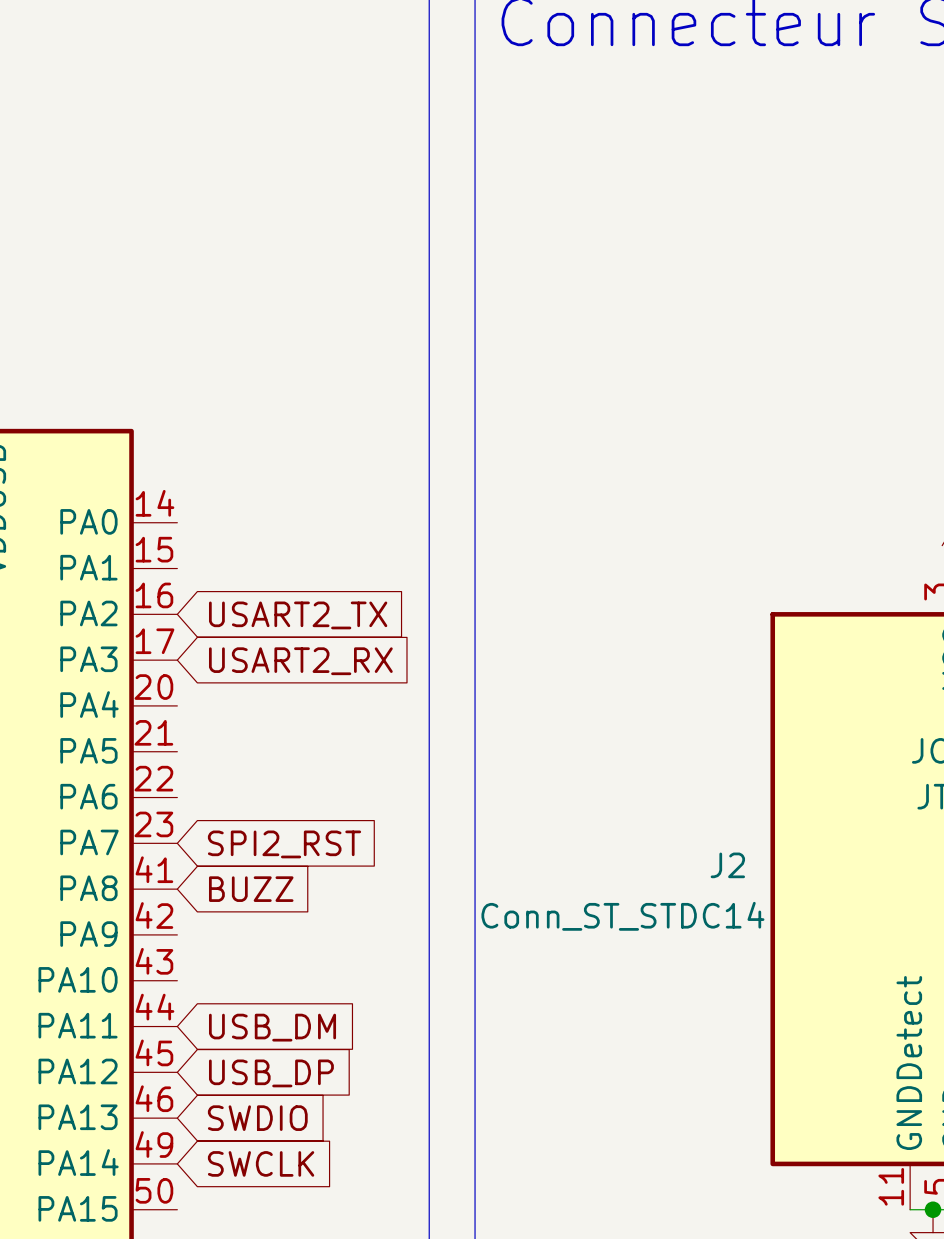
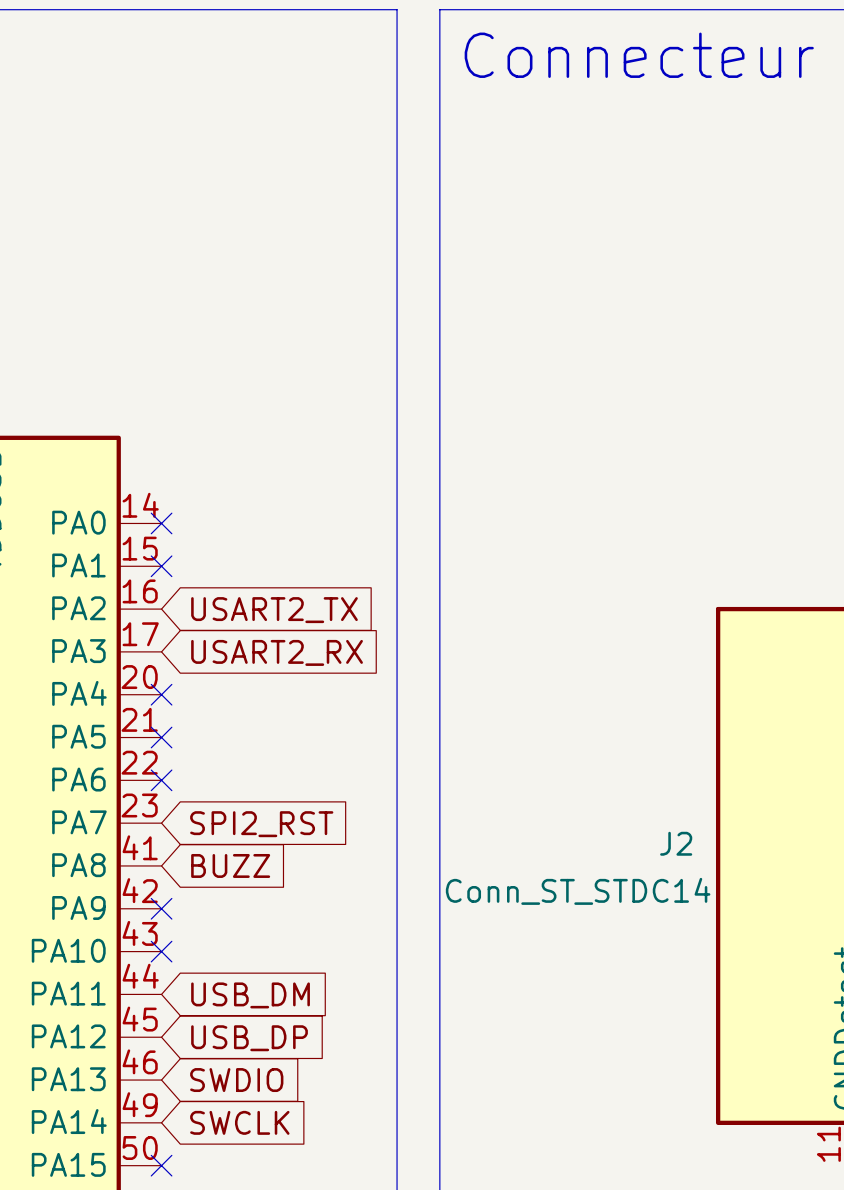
no-connect mark: none -> (161, 523)
no-connect mark: none -> (161, 566)
no-connect mark: none -> (161, 694)
no-connect mark: none -> (161, 737)
no-connect mark: none -> (161, 780)
no-connect mark: none -> (161, 908)
no-connect mark: none -> (161, 951)
no-connect mark: none -> (161, 1165)

